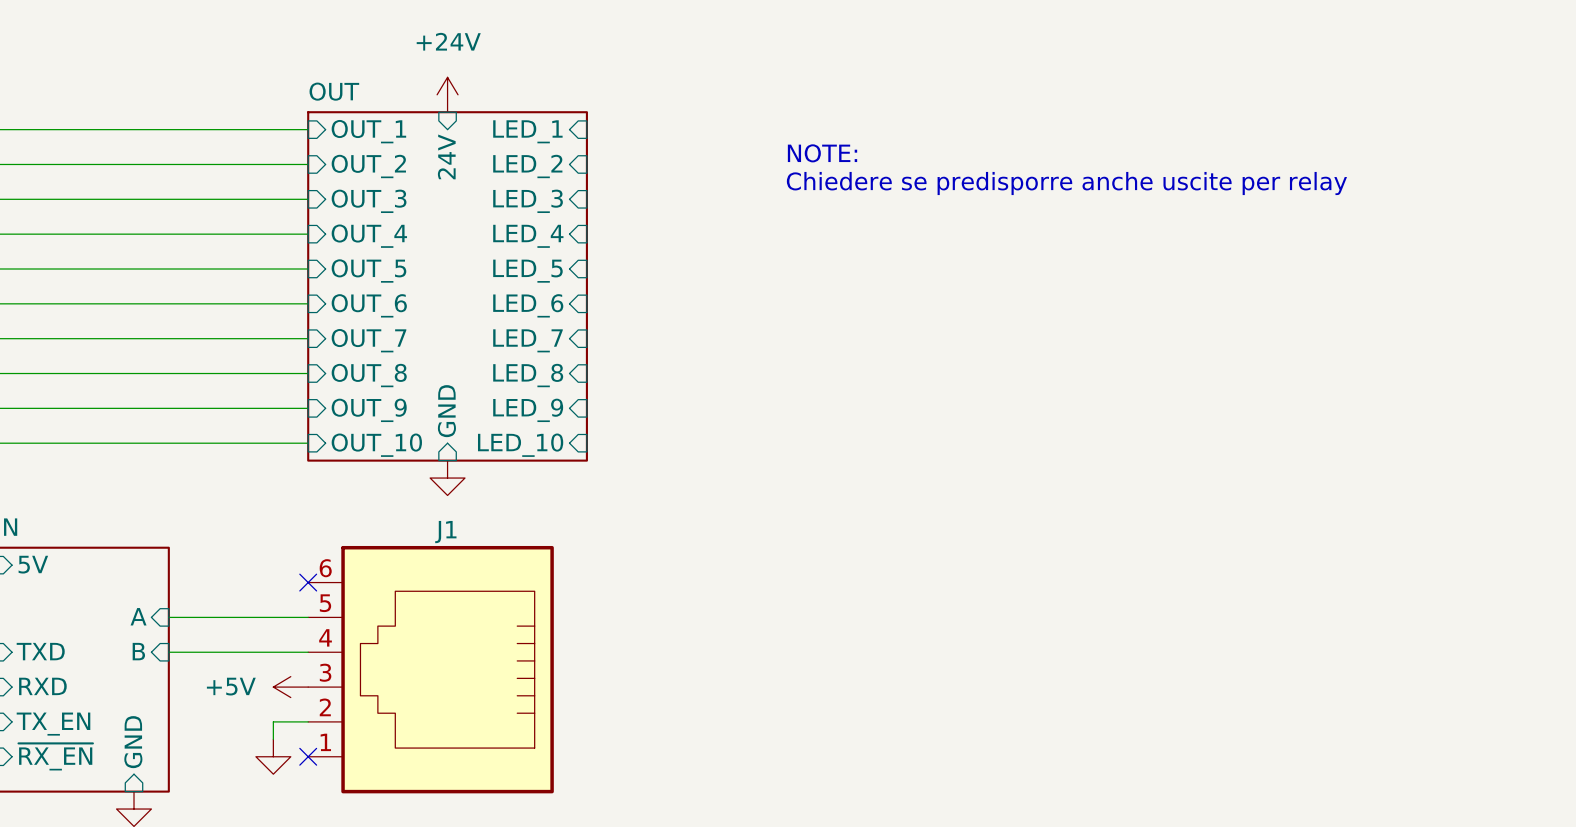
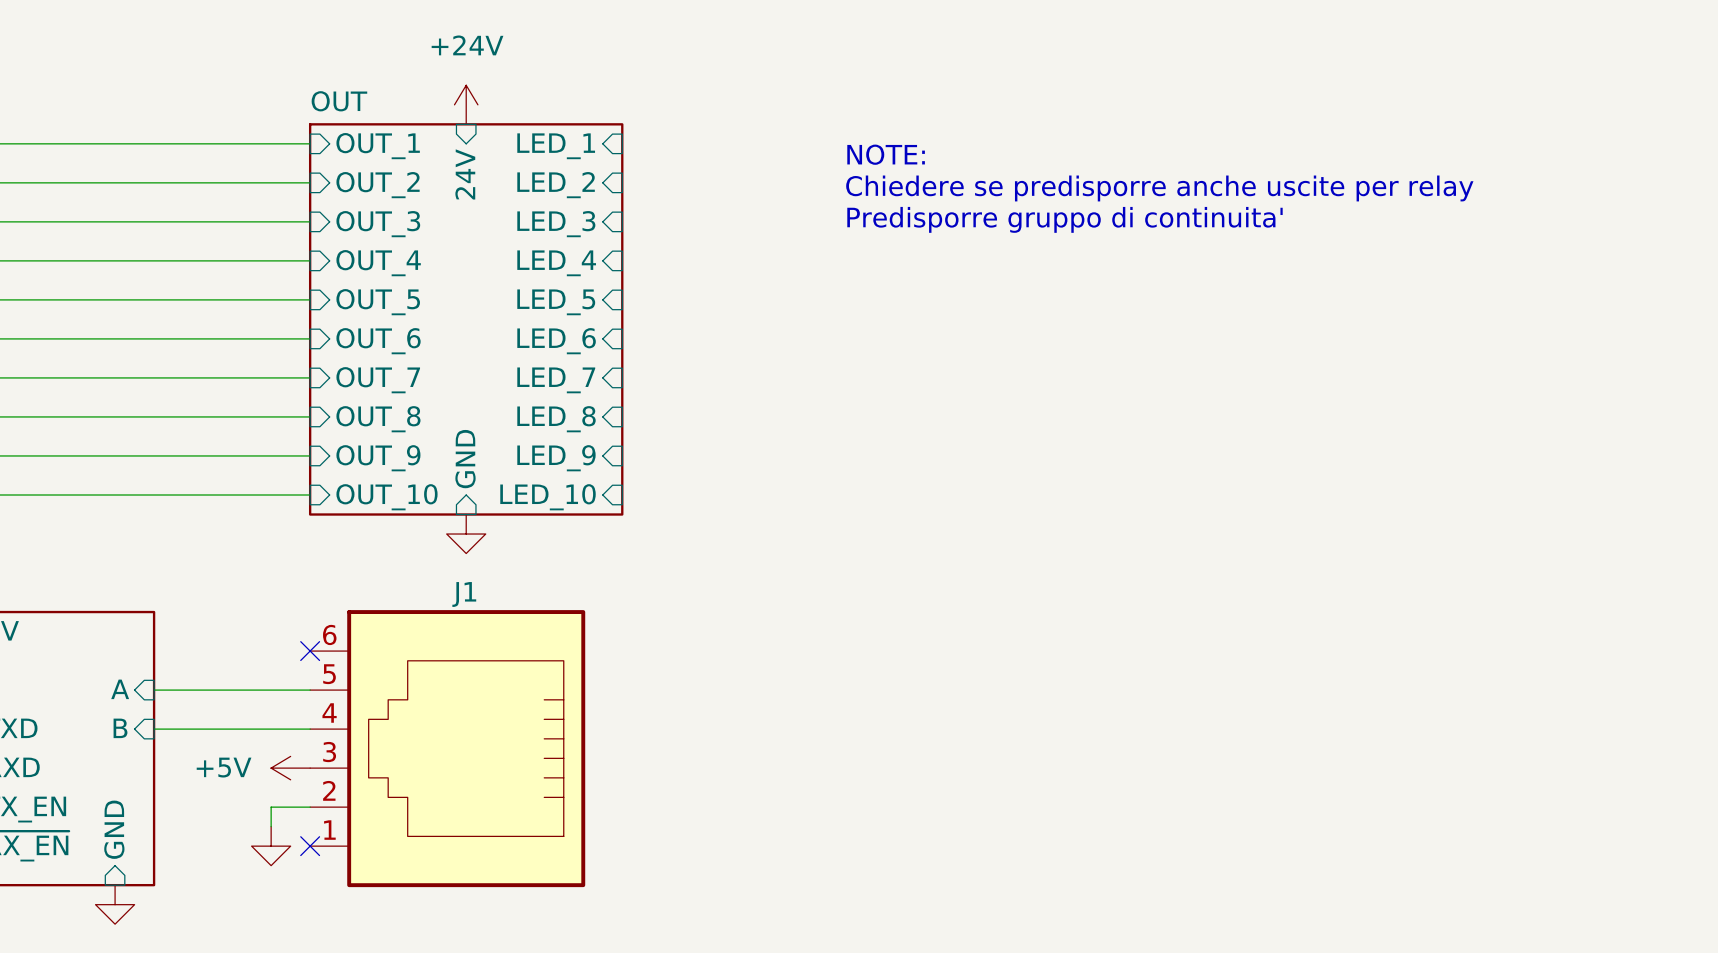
text position: NOTE: (822, 153) -> NOTE: (886, 154)
text position: Chiedere se predisporre anche uscite per relay (1066, 183) -> Chiedere se predisporre anche uscite per relay (1159, 188)
text: none -> Predisporre gruppo di continuita' (1064, 219)

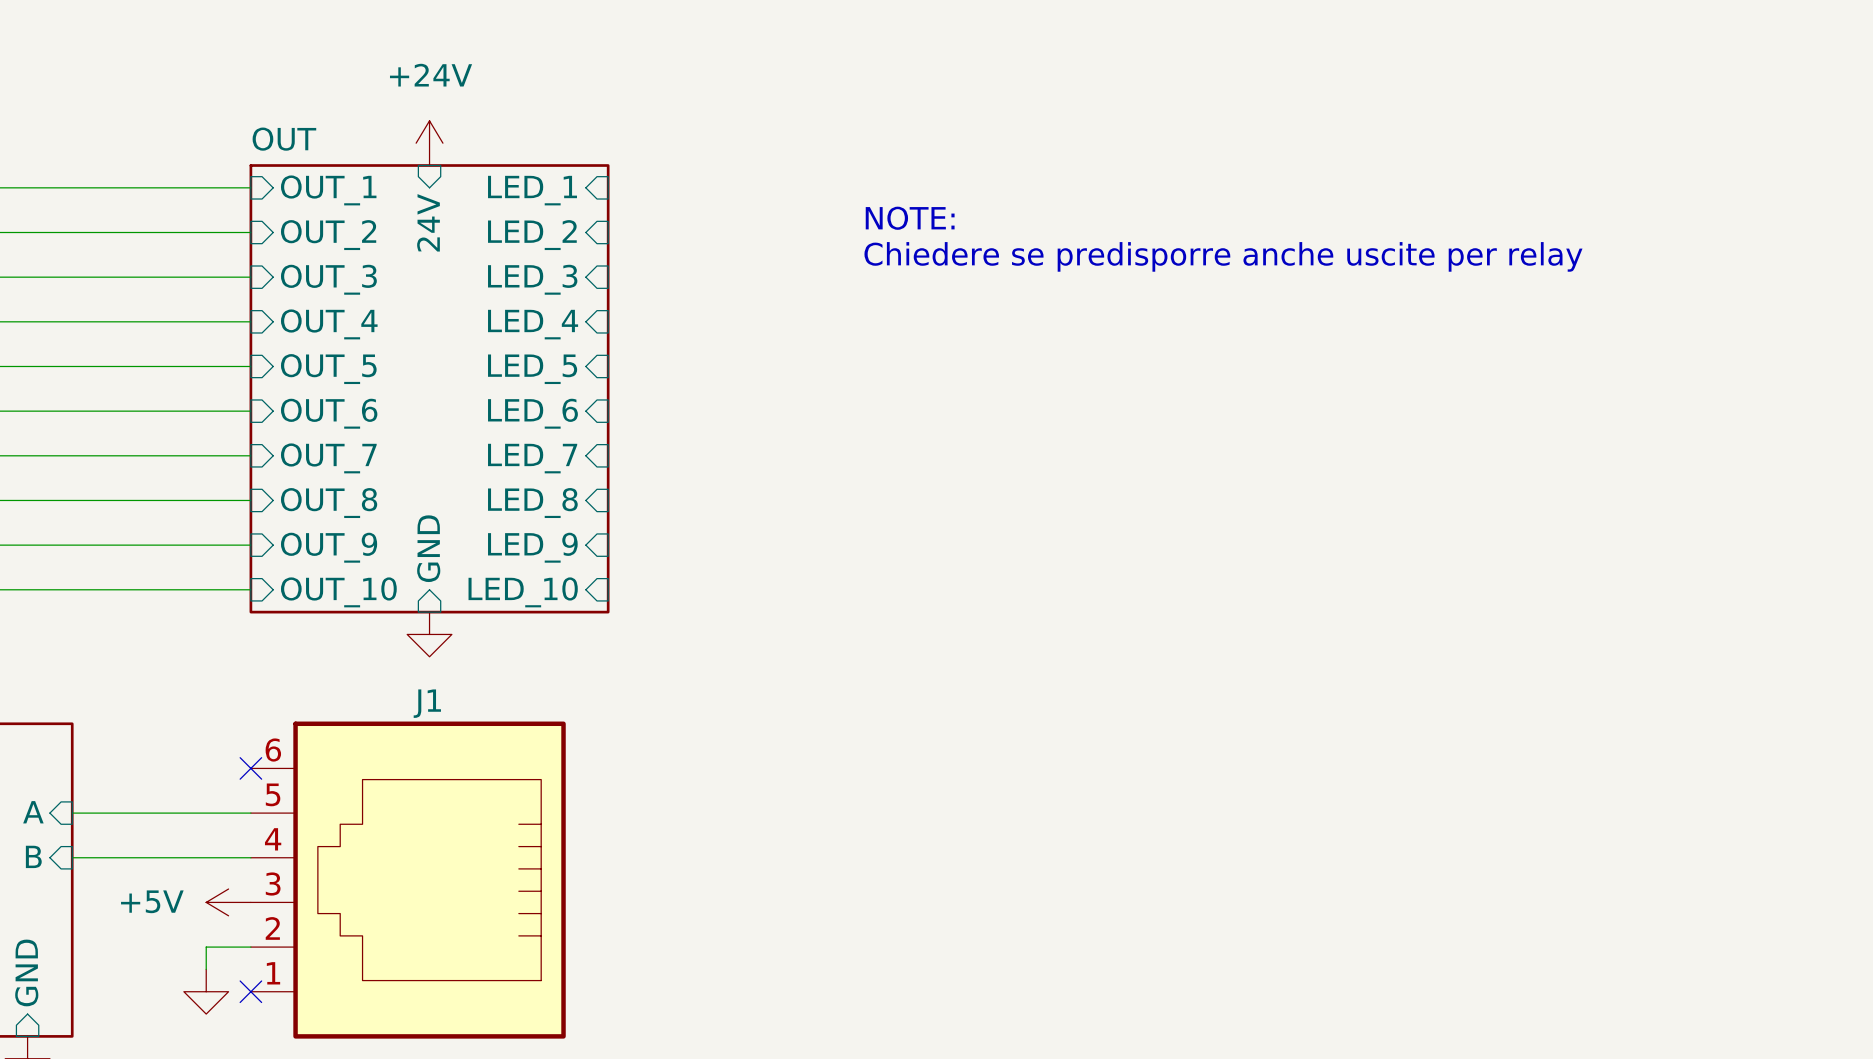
text position: NOTE: (886, 154) -> NOTE: (910, 218)
text position: Chiedere se predisporre anche uscite per relay (1159, 188) -> Chiedere se predisporre anche uscite per relay (1223, 256)
text: Predisporre gruppo di continuita' (1064, 219) -> none

